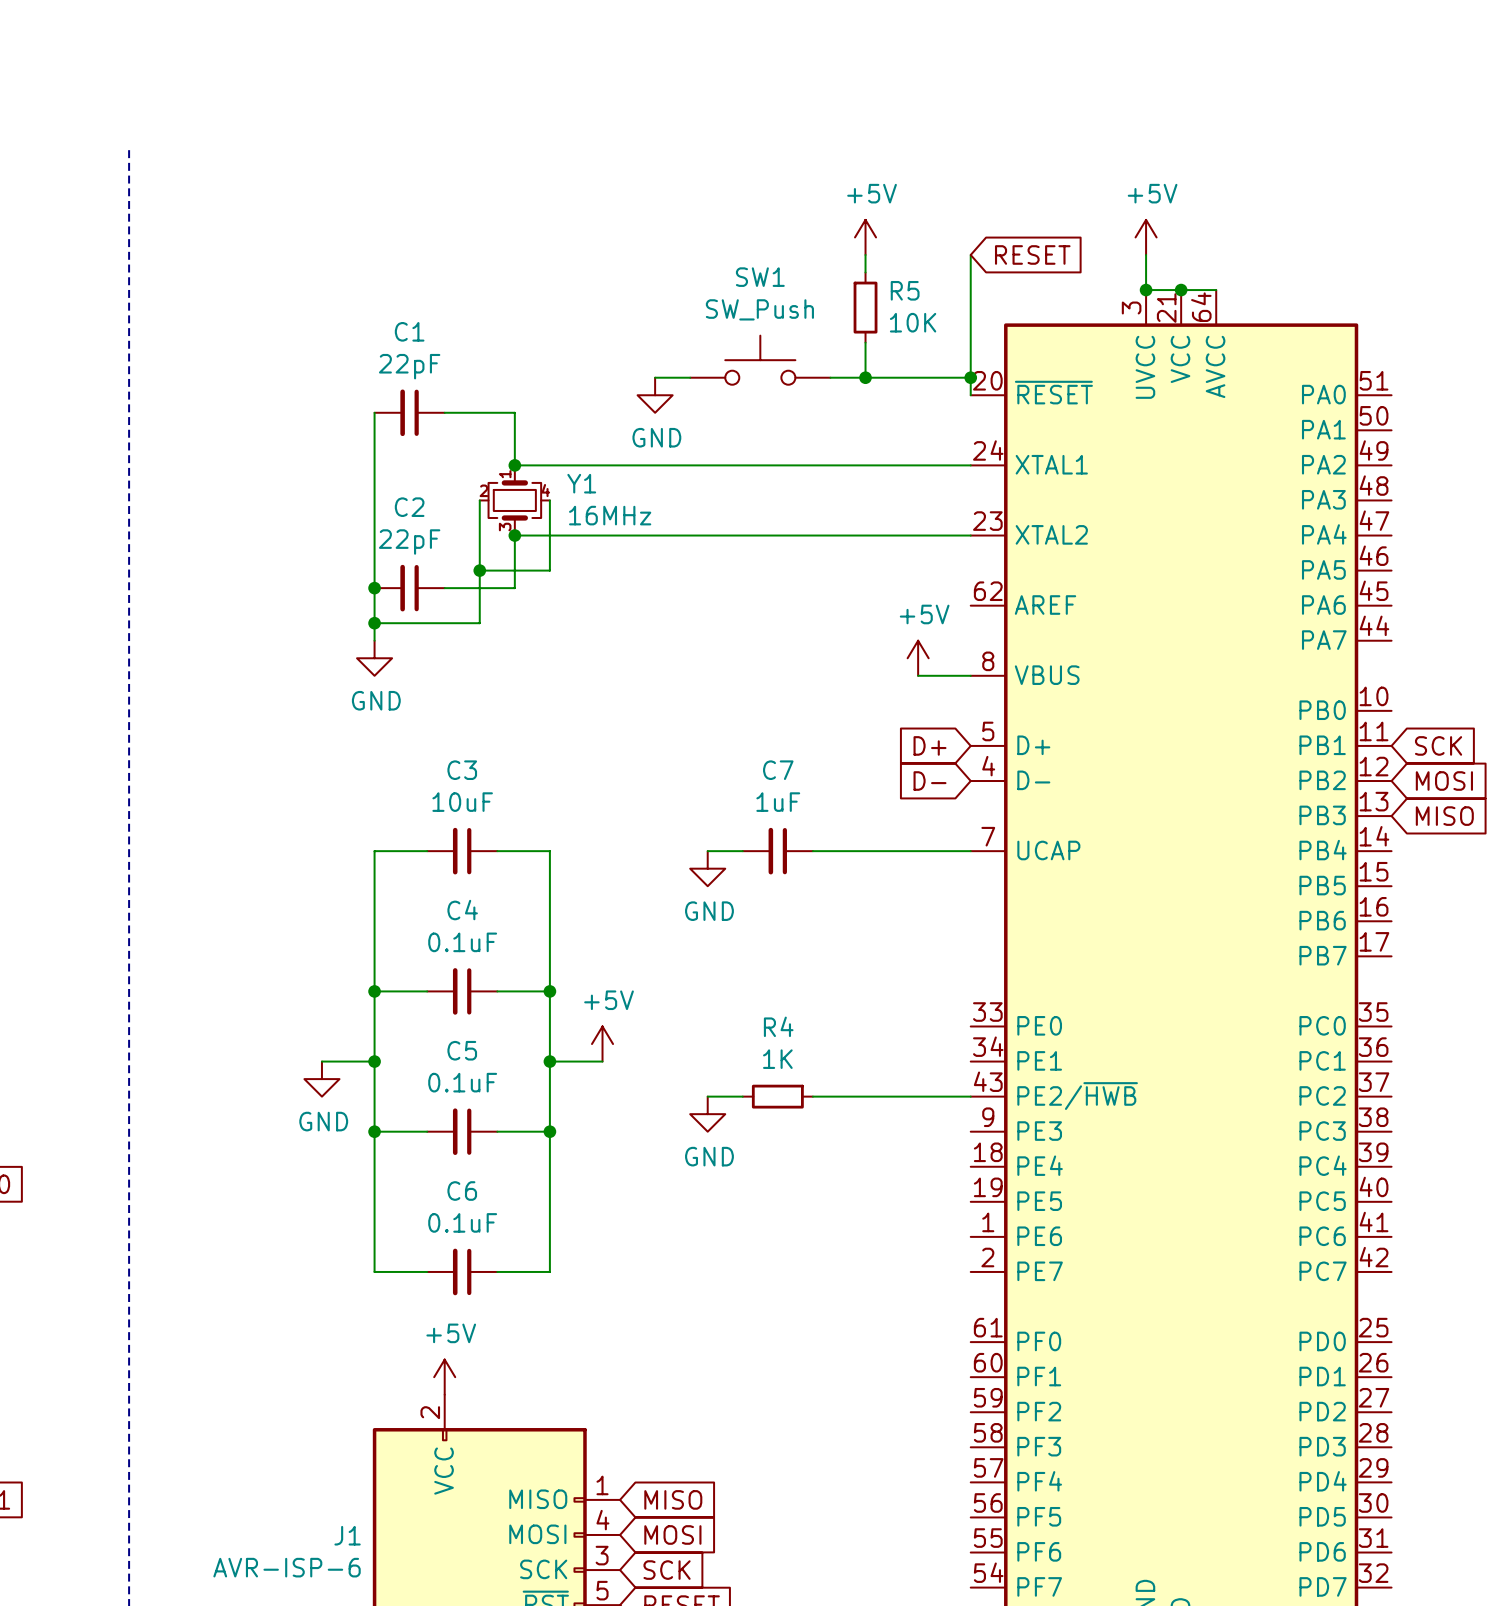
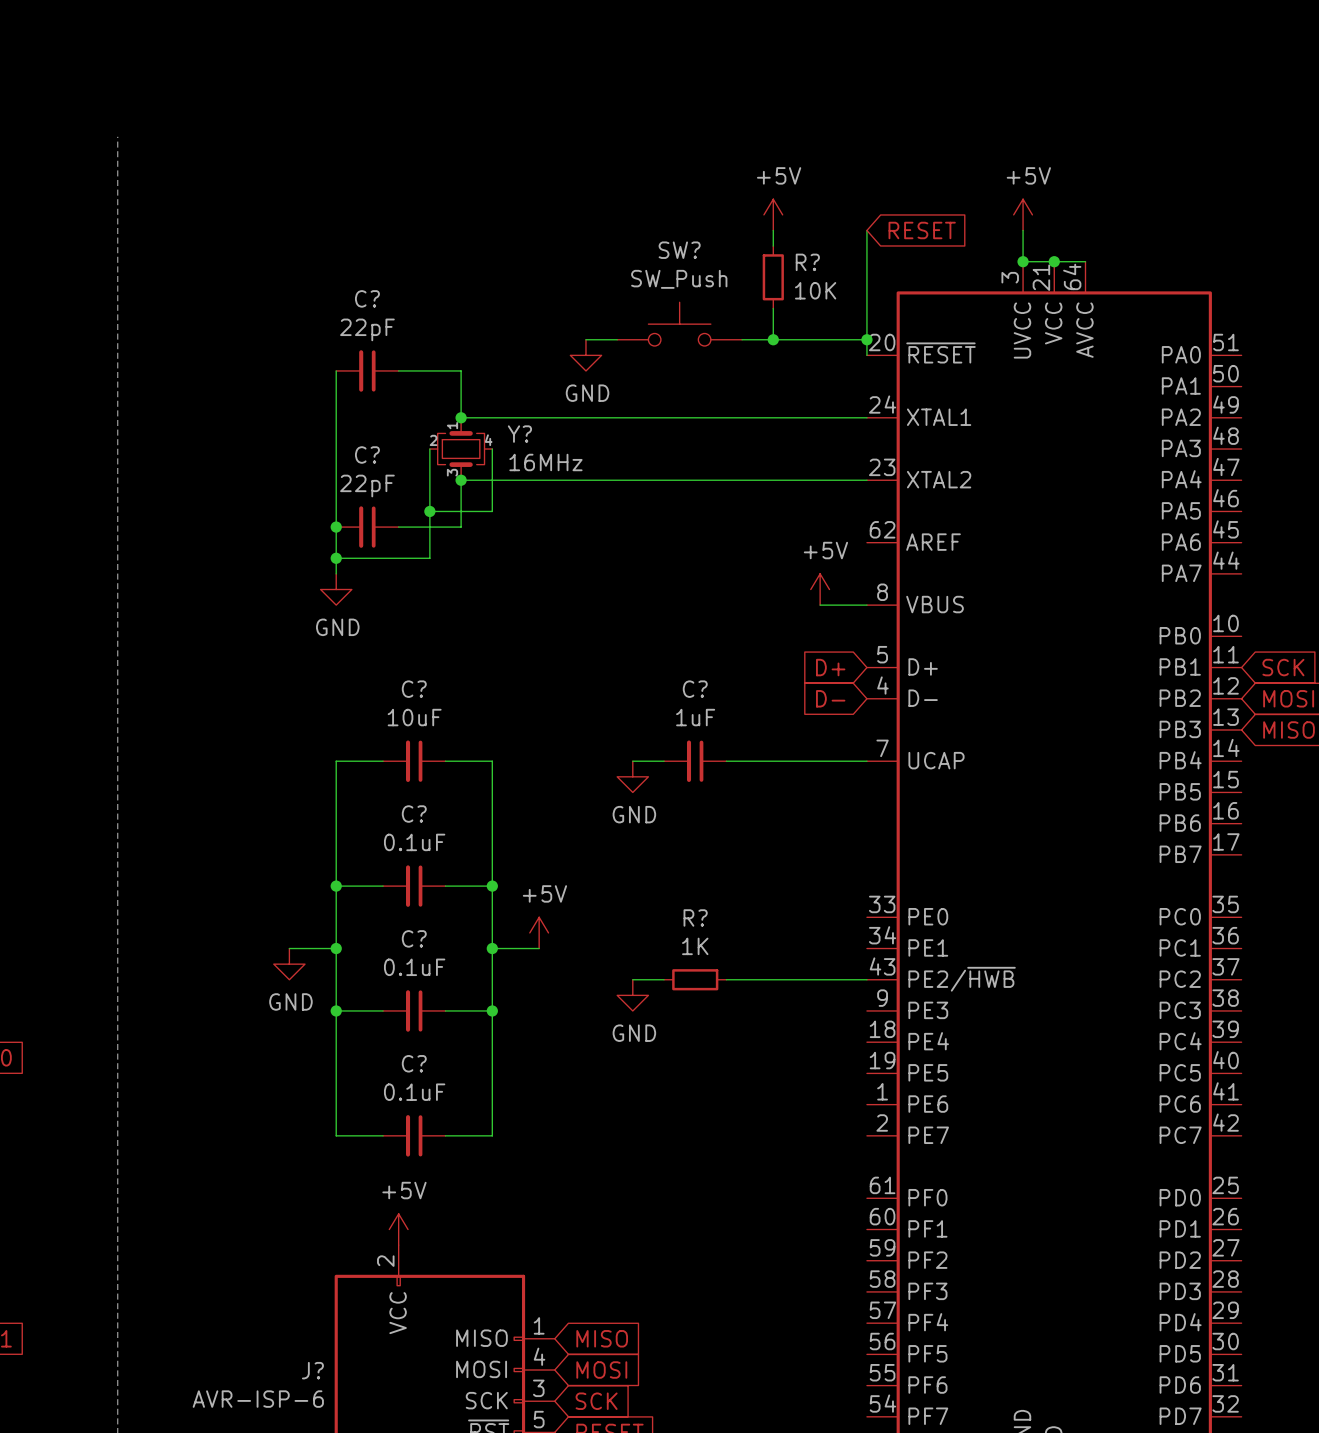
SW1 name: SW1 (760, 277) -> SW? (679, 250)
R5 name: R5 (905, 290) -> R? (807, 262)
C1 name: C1 (409, 331) -> C? (367, 298)
Y1 name: Y1 (581, 483) -> Y? (519, 434)
C2 name: C2 (409, 507) -> C? (367, 454)
C3 name: C3 (462, 770) -> C? (414, 689)
C7 name: C7 (778, 770) -> C? (695, 689)
C4 name: C4 (462, 910) -> C? (414, 814)
R4 name: R4 (778, 1026) -> R? (695, 917)
C5 name: C5 (462, 1050) -> C? (414, 938)
C6 name: C6 (462, 1191) -> C? (414, 1063)
J1 name: J1 (347, 1535) -> J? (312, 1370)

